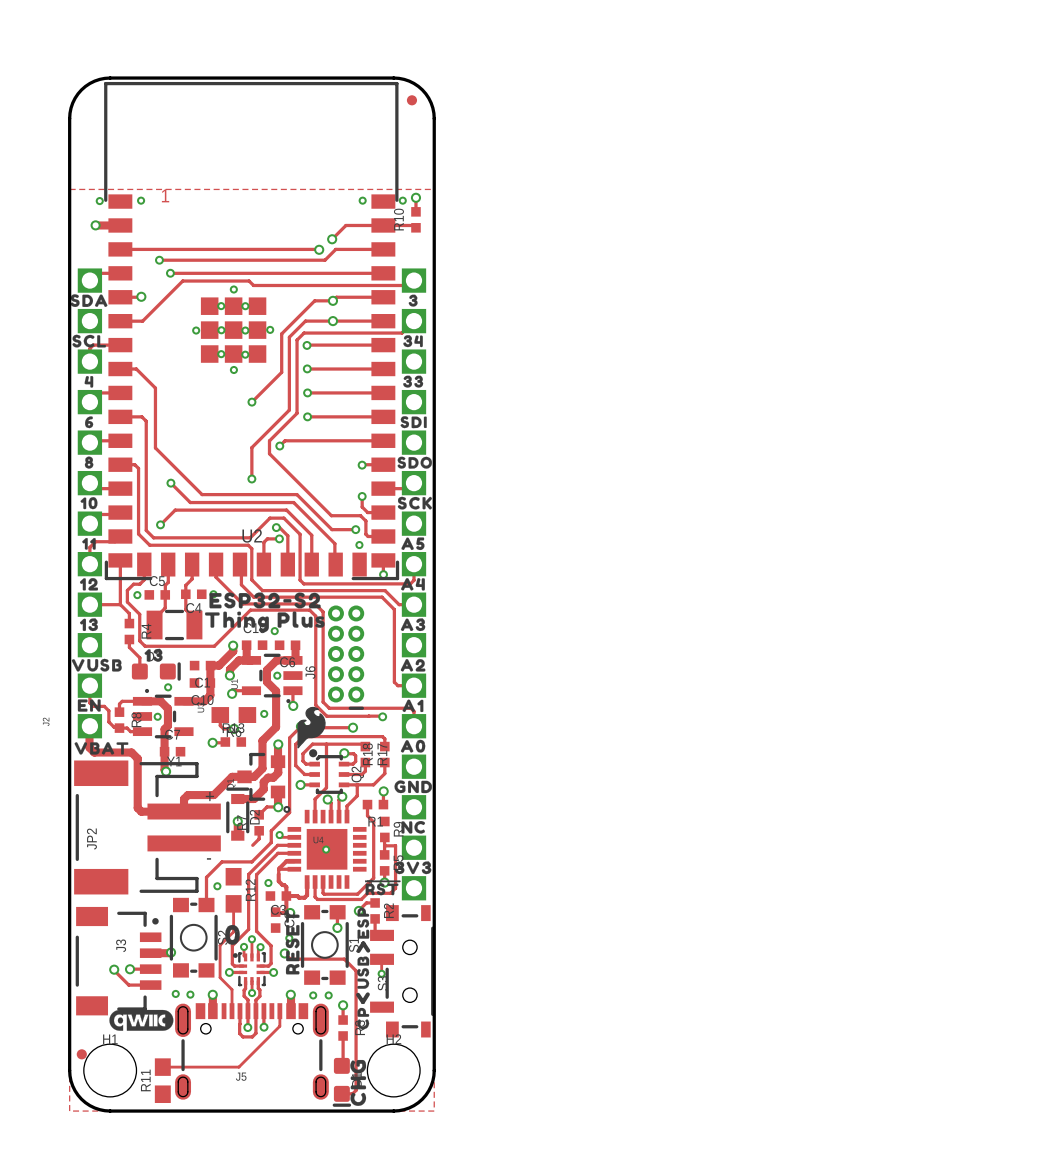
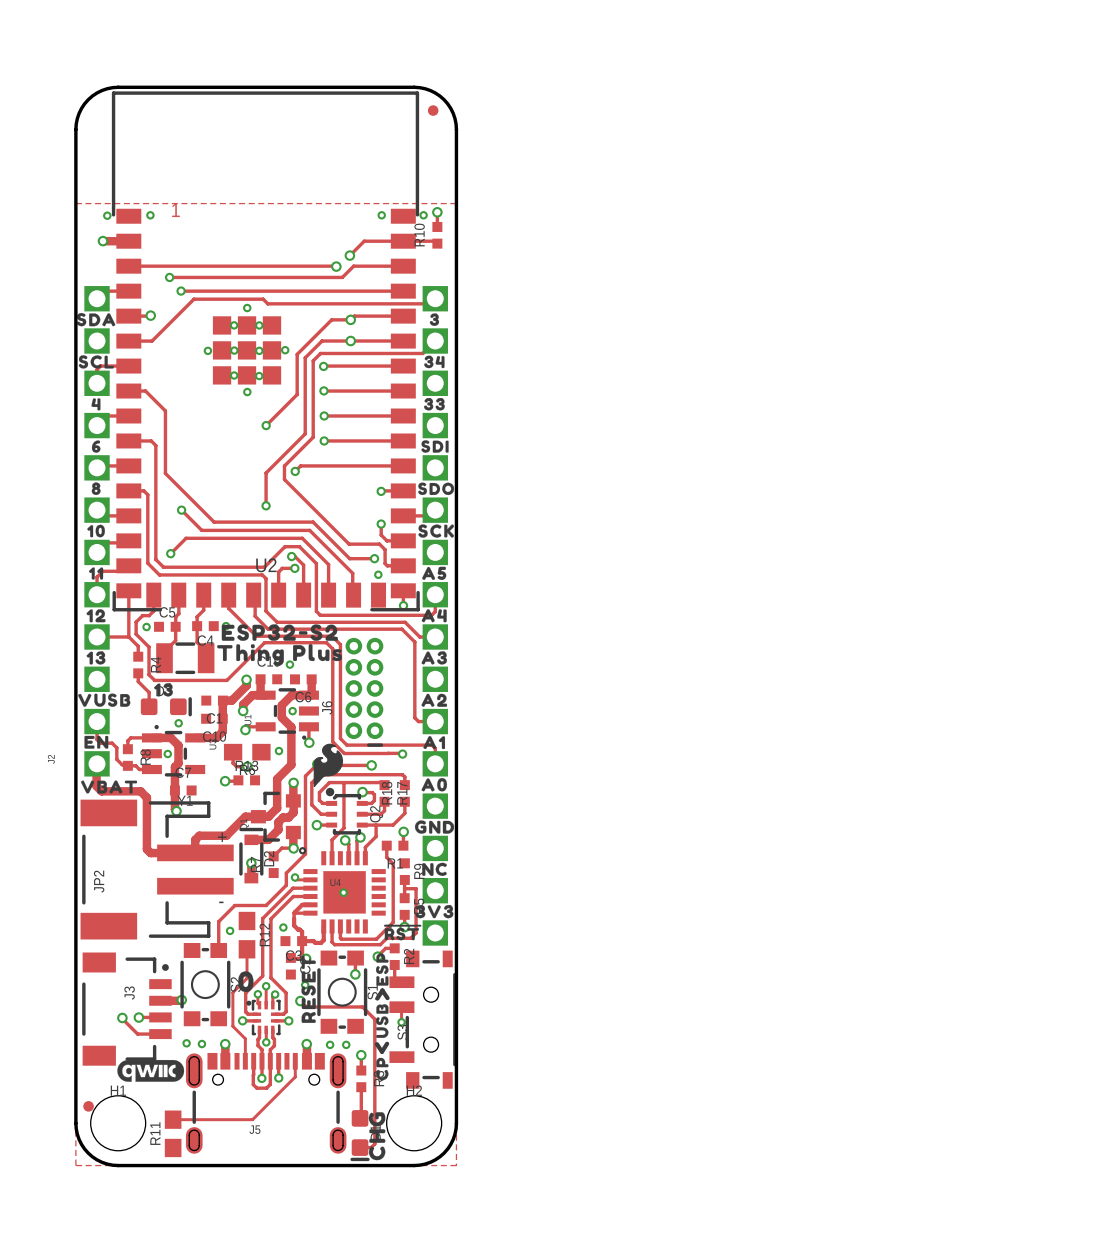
track: (259, 830) (259, 838) (252, 845) -> none

